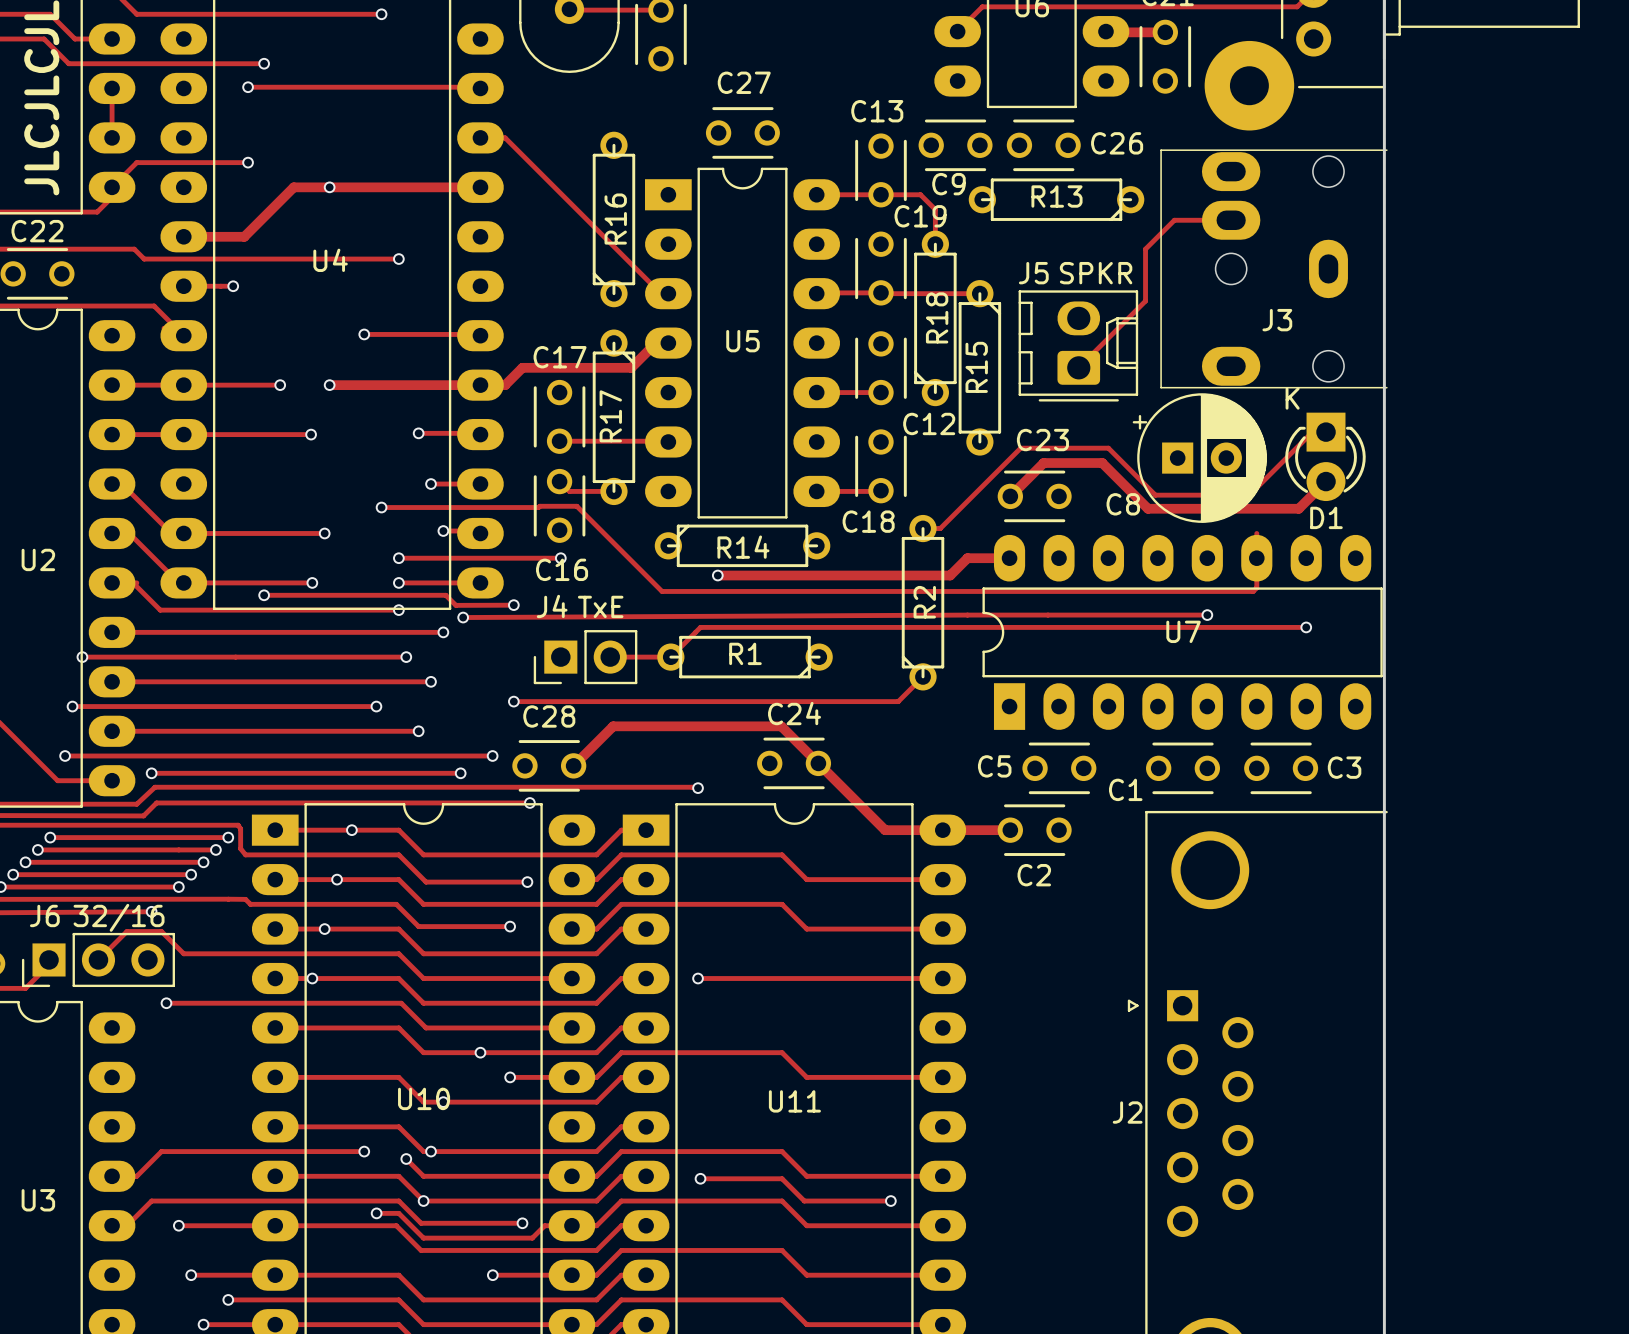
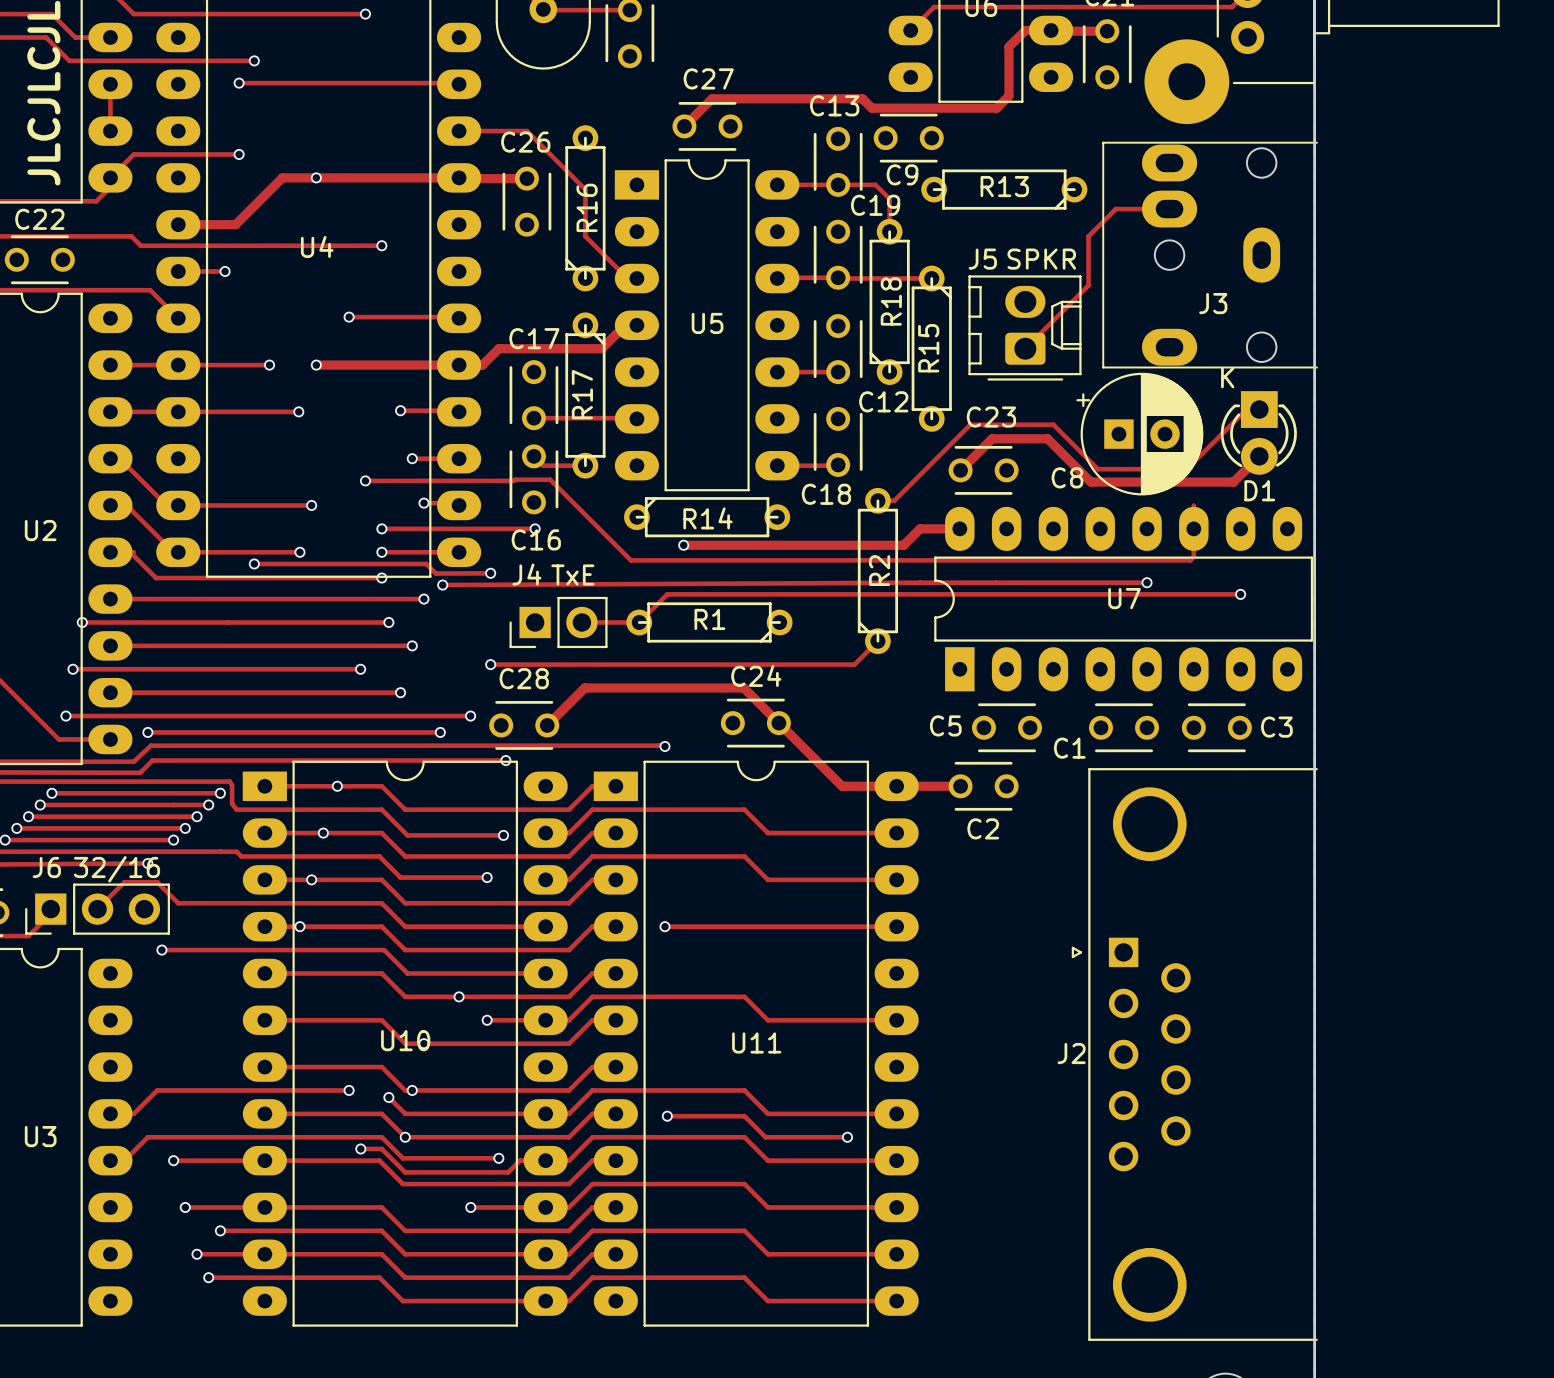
track: none -> (1051, 30) (1025, 30) (1008, 46) (1008, 95) (996, 108) (871, 108) (862, 98) (712, 98) (684, 126)
track: (505, 137) (660, 293) -> (482, 131) (526, 131) (585, 189) (585, 236) (627, 278) (629, 278)
C26 name position: C26 (1117, 143) -> C26 (525, 142)
C26 rotation: 0° (1043, 145) -> 90° clockwise (526, 201)
C26 position: (1043, 145) -> (526, 201)
track: none -> (459, 177) (526, 178)

